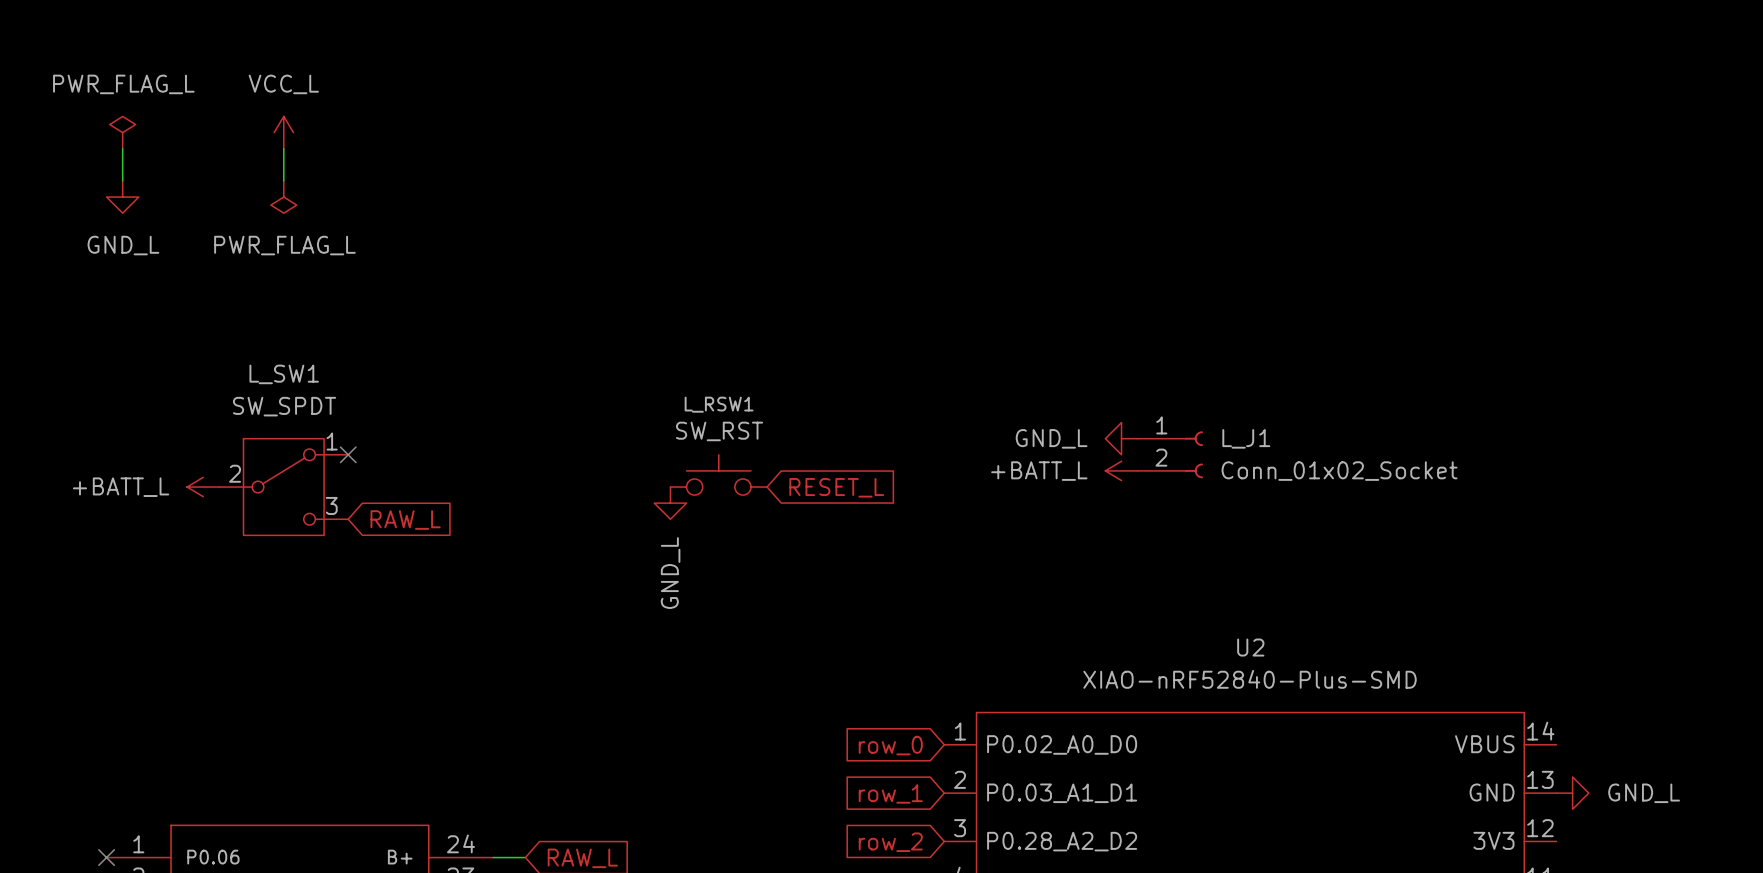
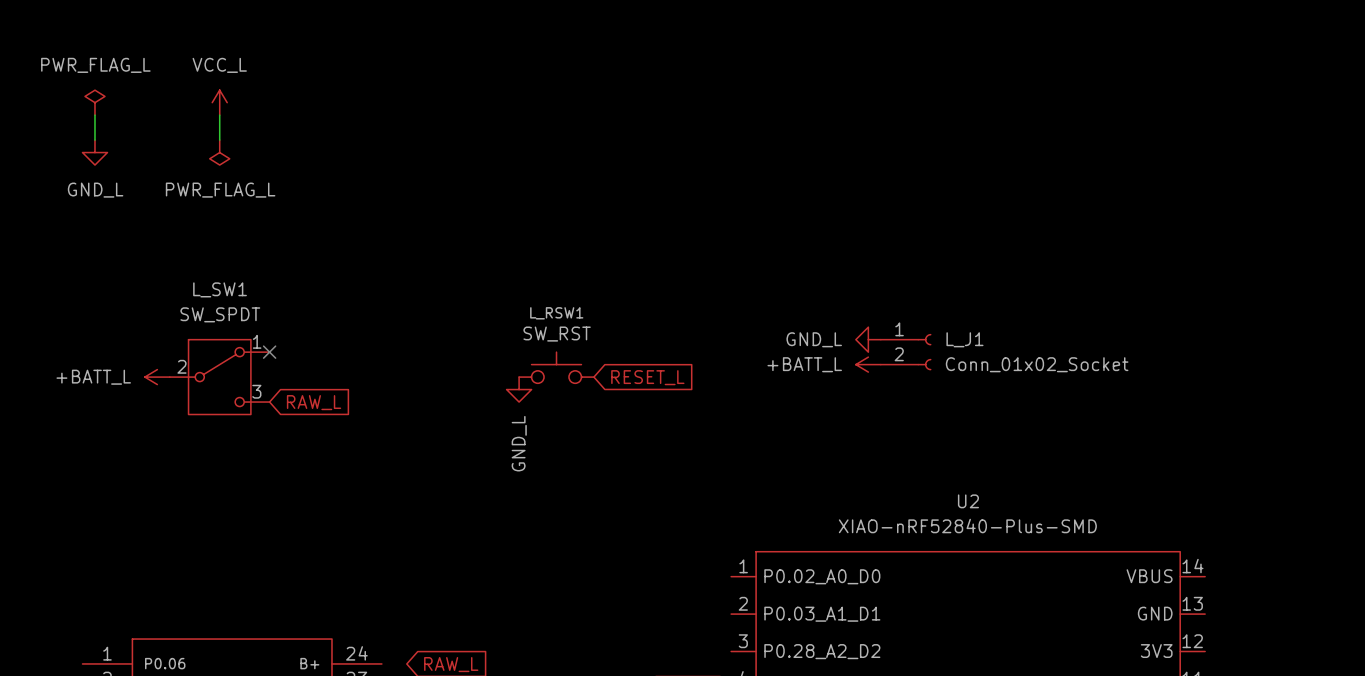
global label: row_0 (890, 745) -> none
global label: row_1 (890, 793) -> none
power symbol: GND_L (1572, 793) -> none
global label: row_2 (890, 842) -> none
no-connect mark: (106, 857) -> none
wire: (493, 857) (525, 857) -> none

